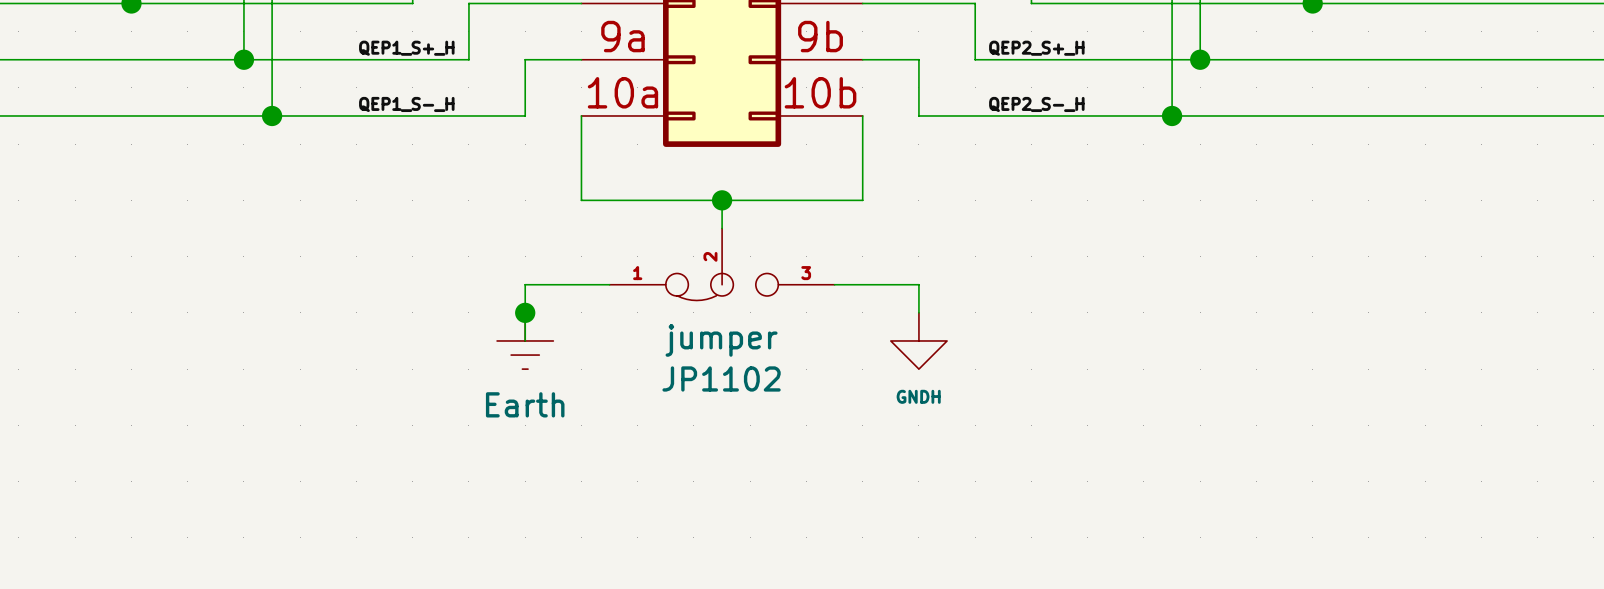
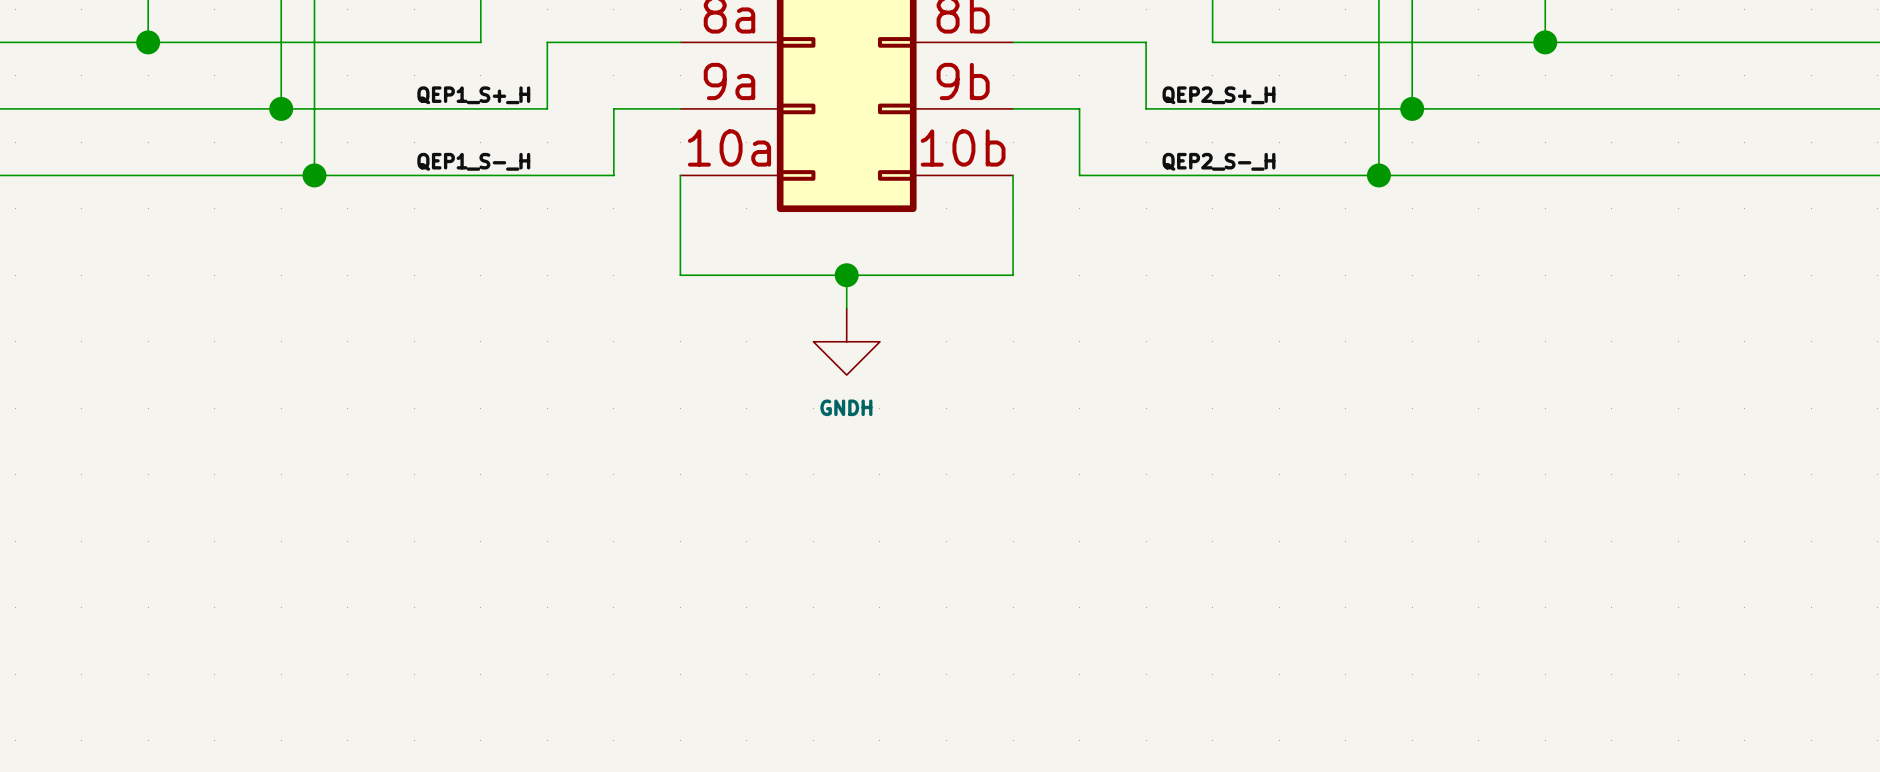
JP1102: jumper (722, 264) -> none
wire: (609, 284) (525, 284) (525, 340) -> none
wire: (834, 284) (918, 284) (918, 312) -> none
junction: (525, 312) -> none
power symbol: Earth (525, 340) -> none
power symbol position: GNDH (918, 340) -> GNDH (846, 341)

